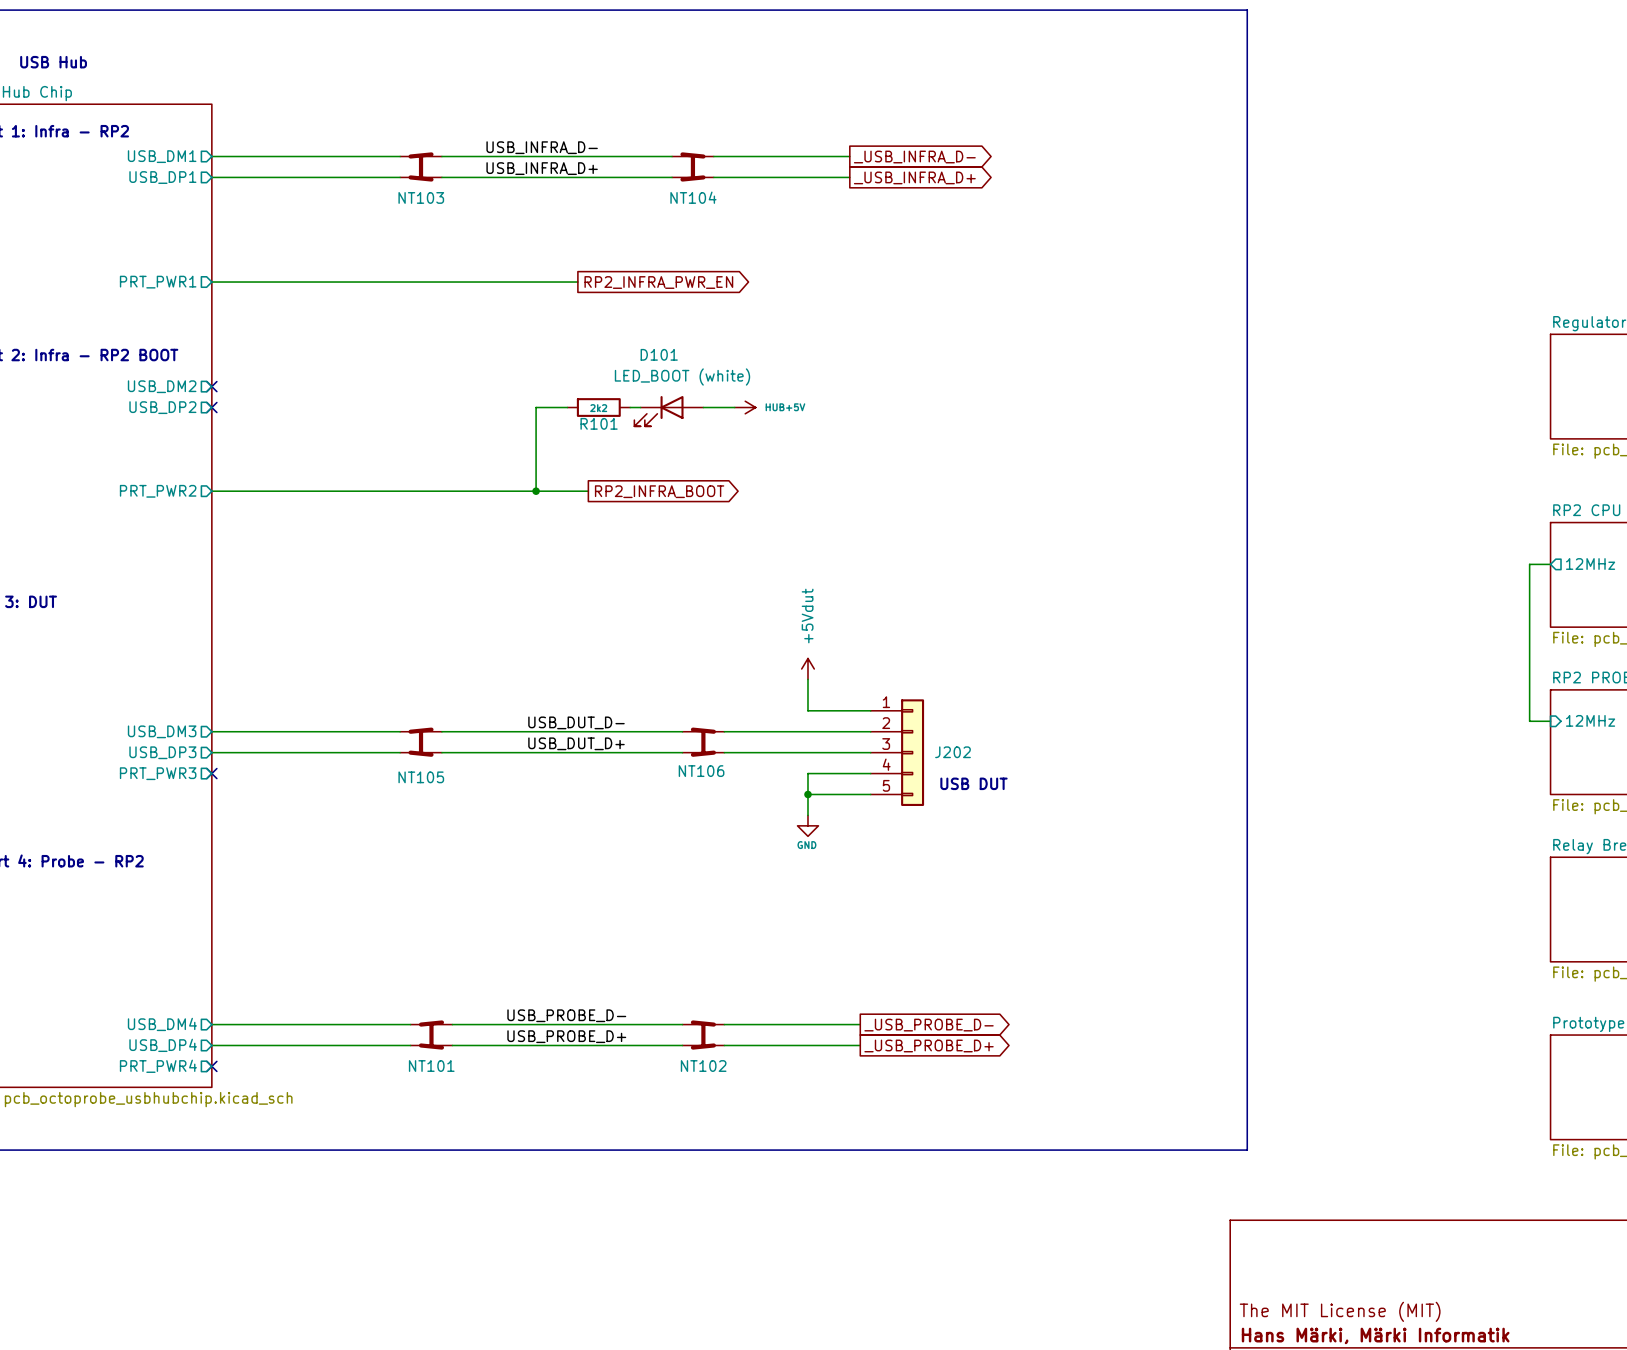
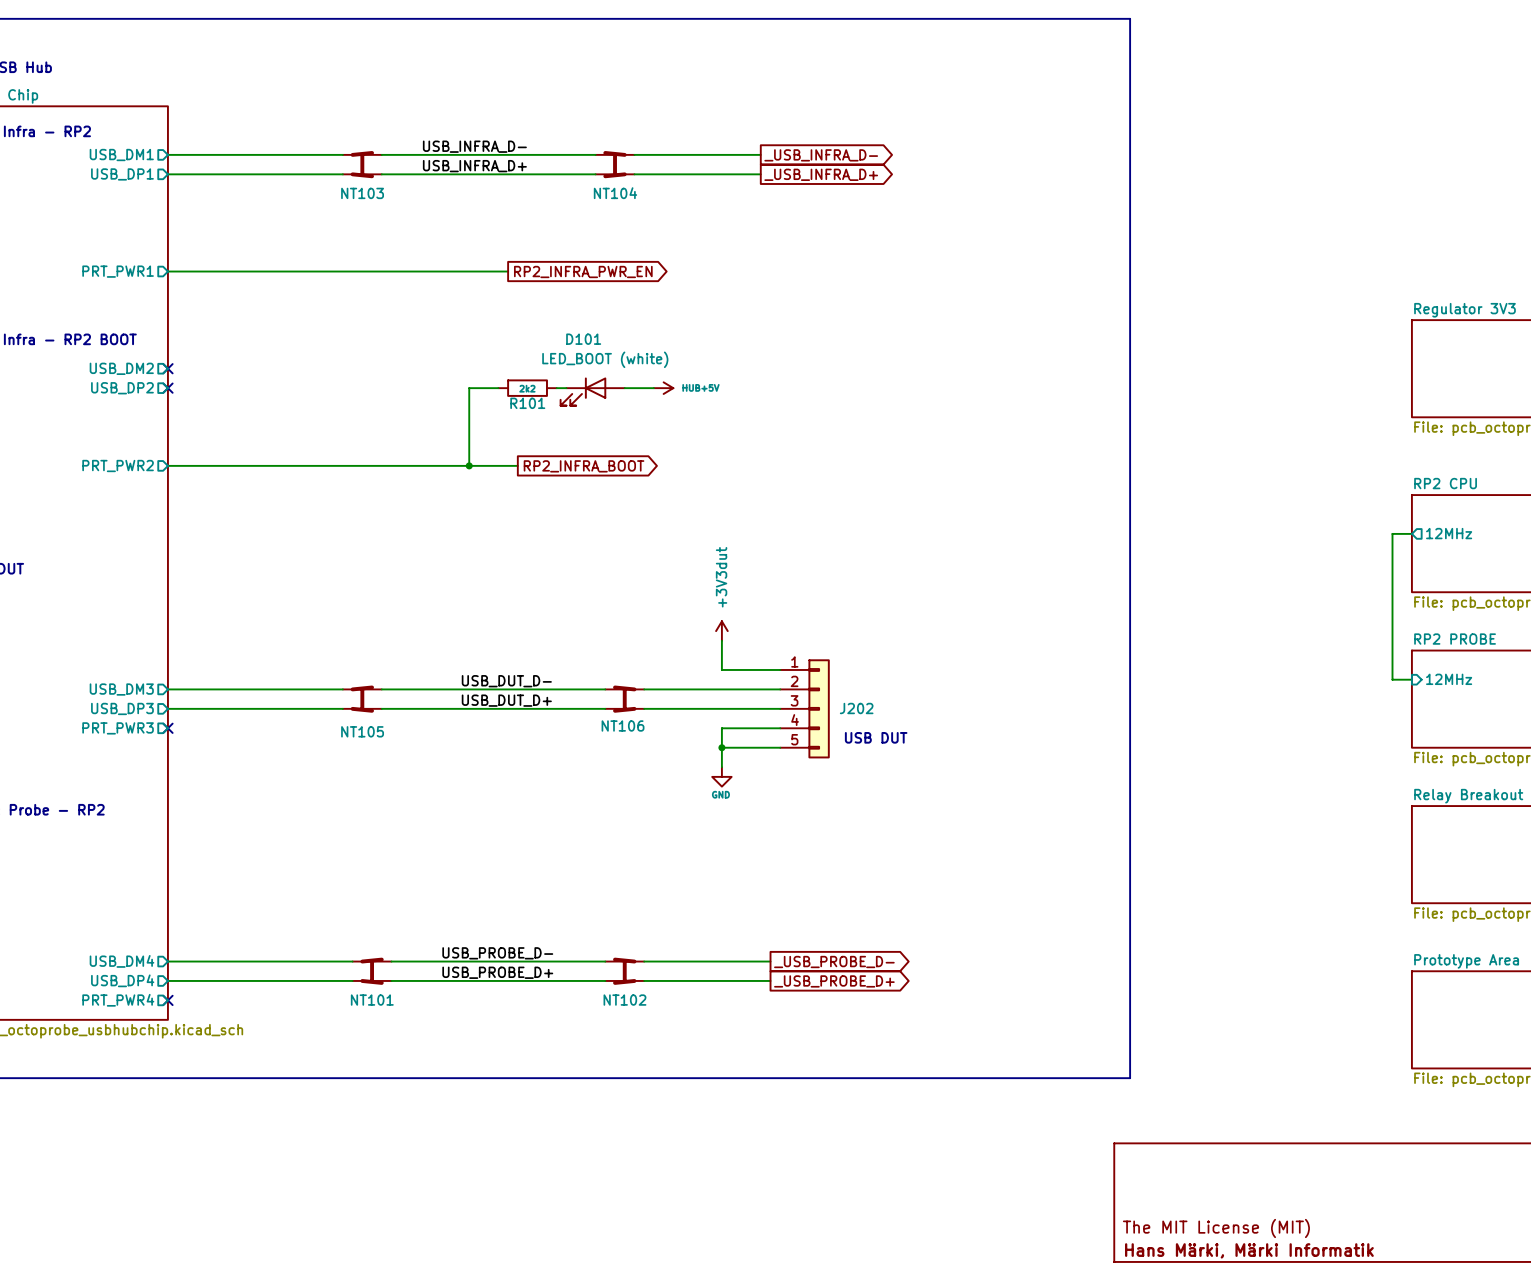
power symbol: +5Vdut (807, 668) -> +3V3dut (721, 631)

